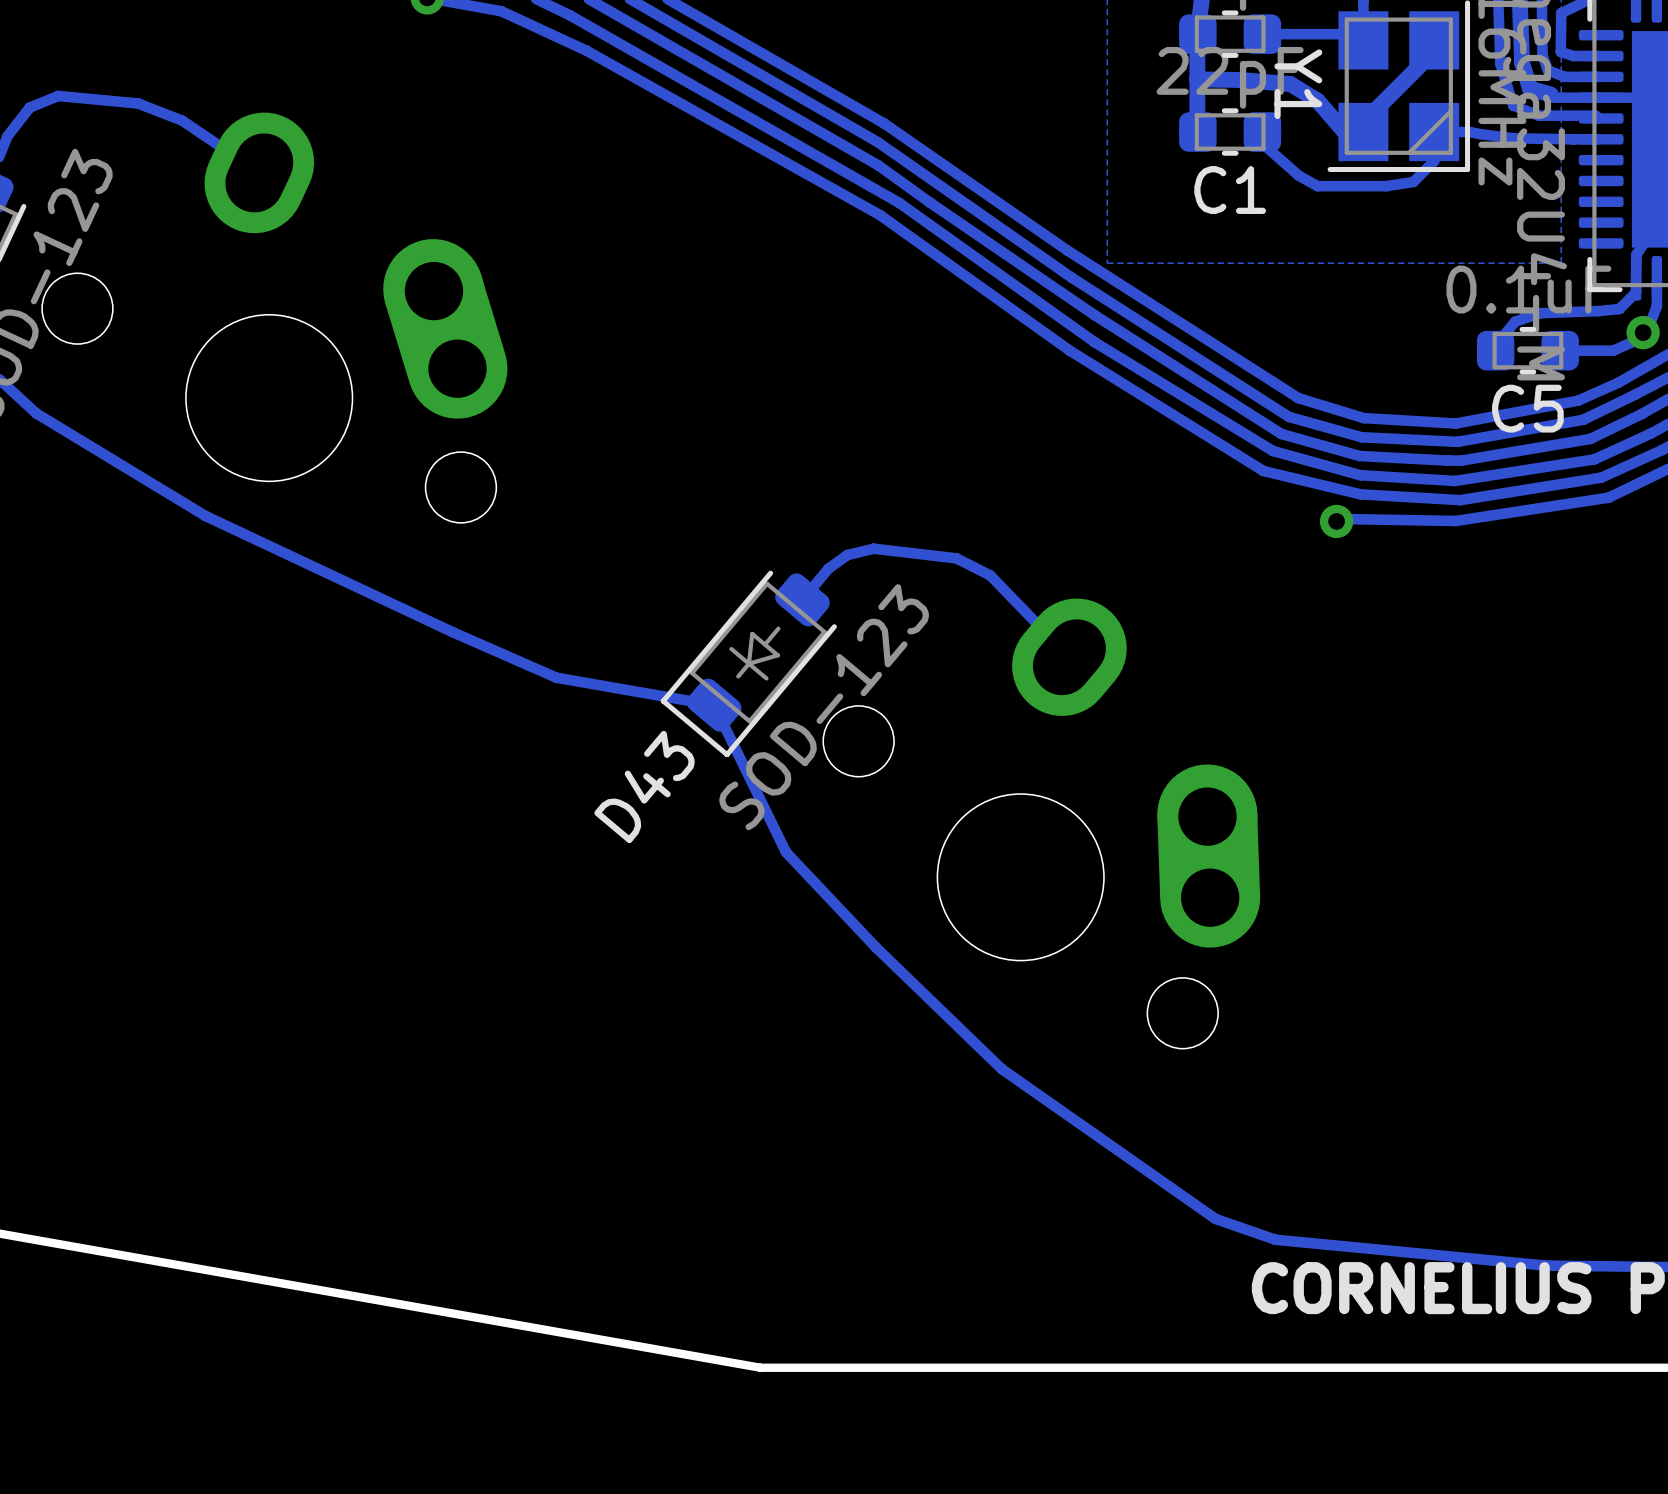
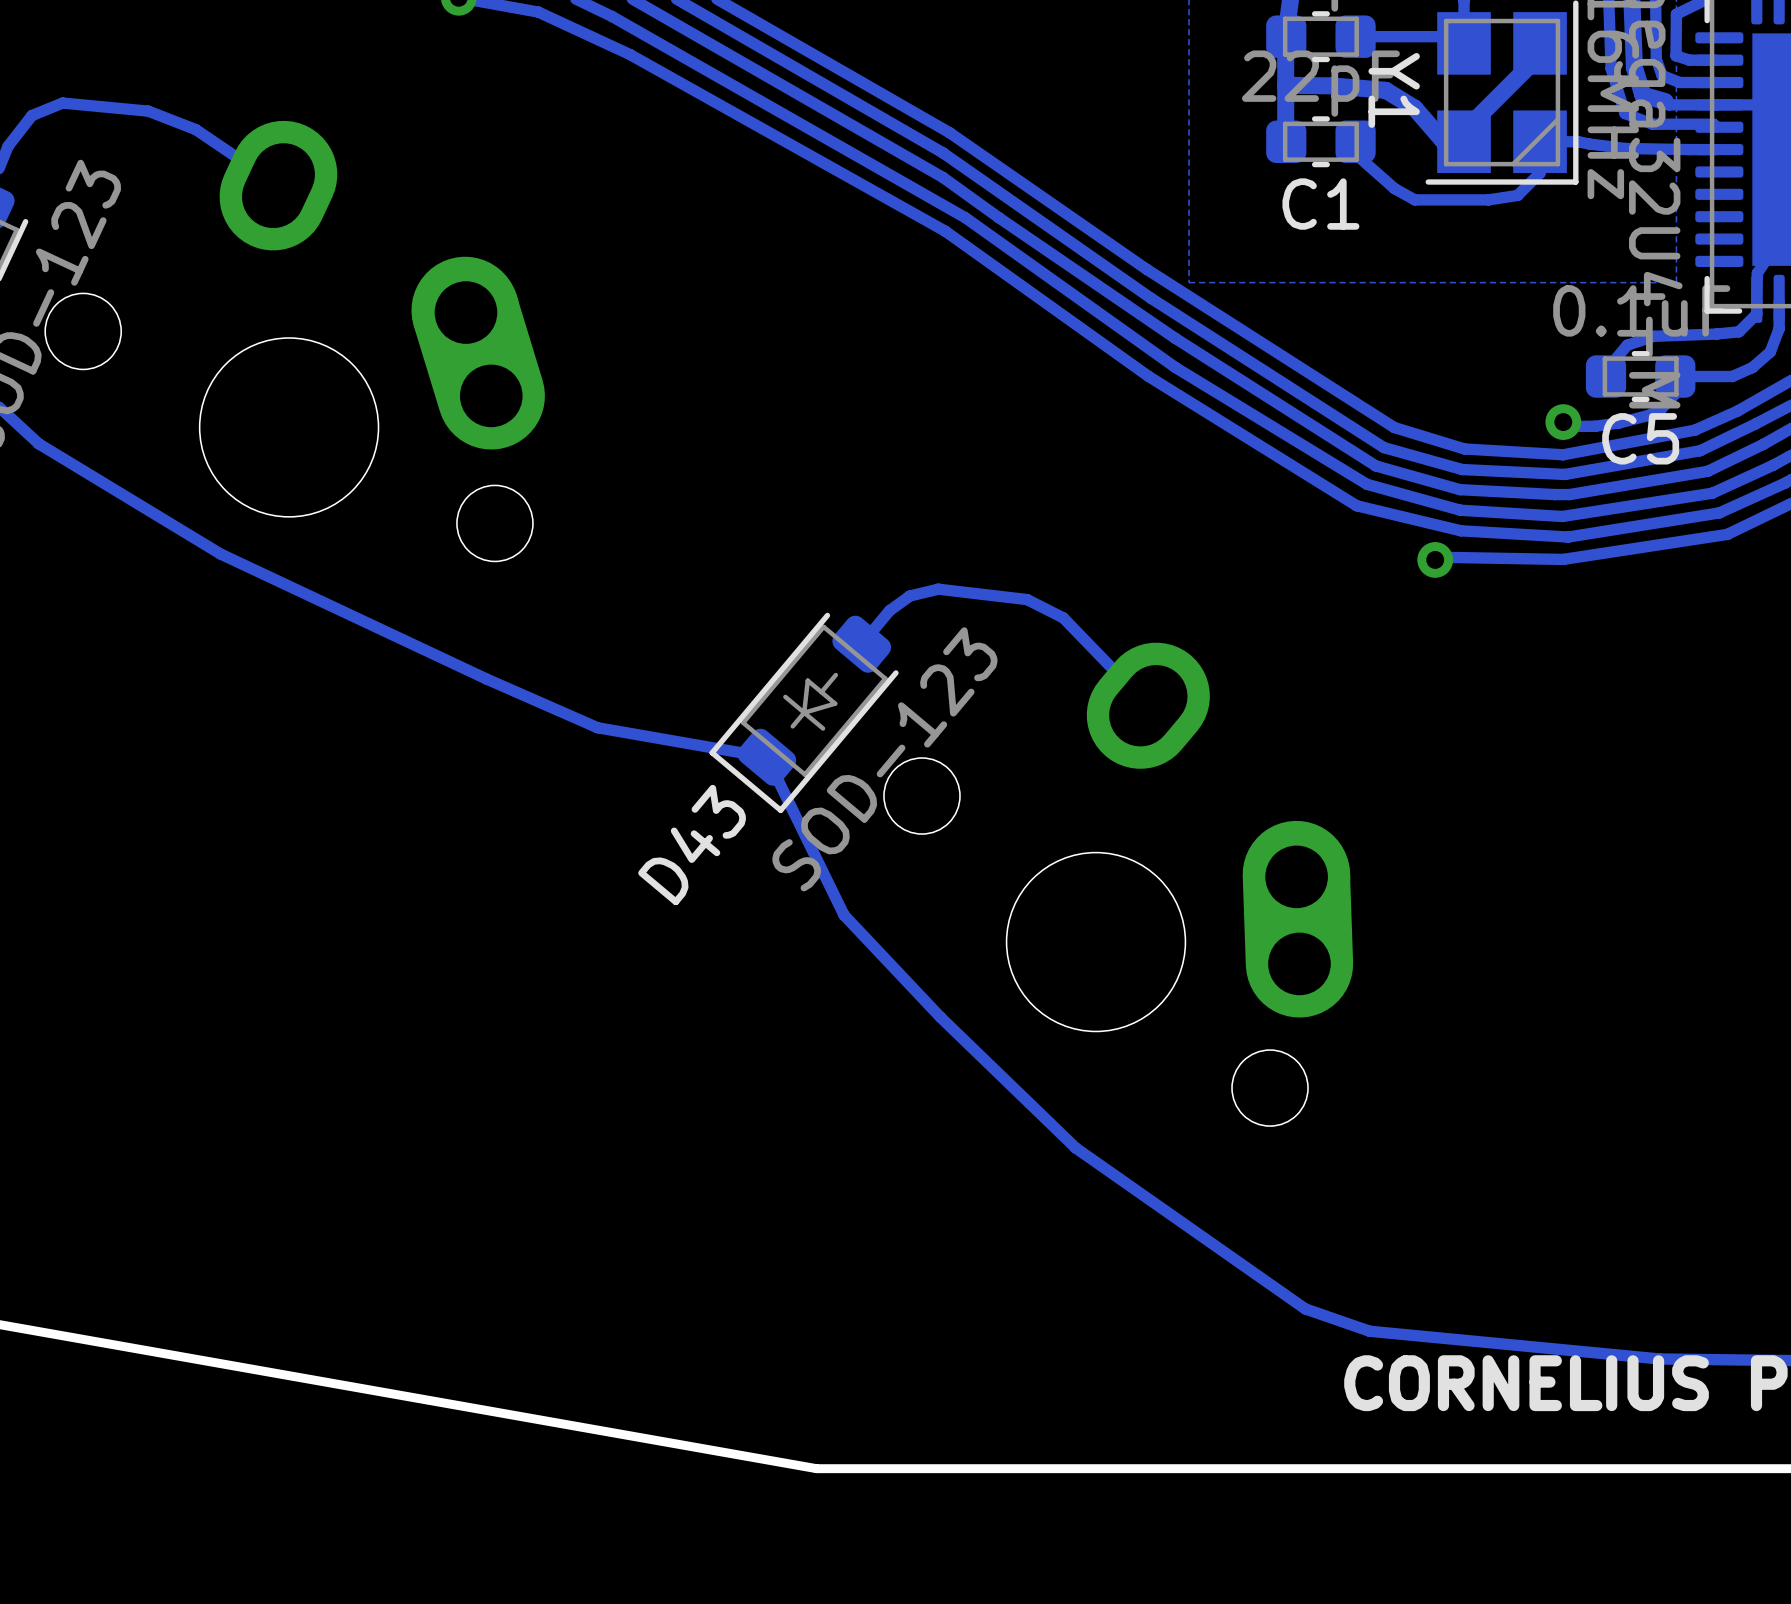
via position: (1643, 332) -> (1563, 422)
track: none -> (1675, 376) (1675, 393) (1660, 409) (1649, 415) (1619, 422) (1595, 426) (1567, 426) (1563, 422)

